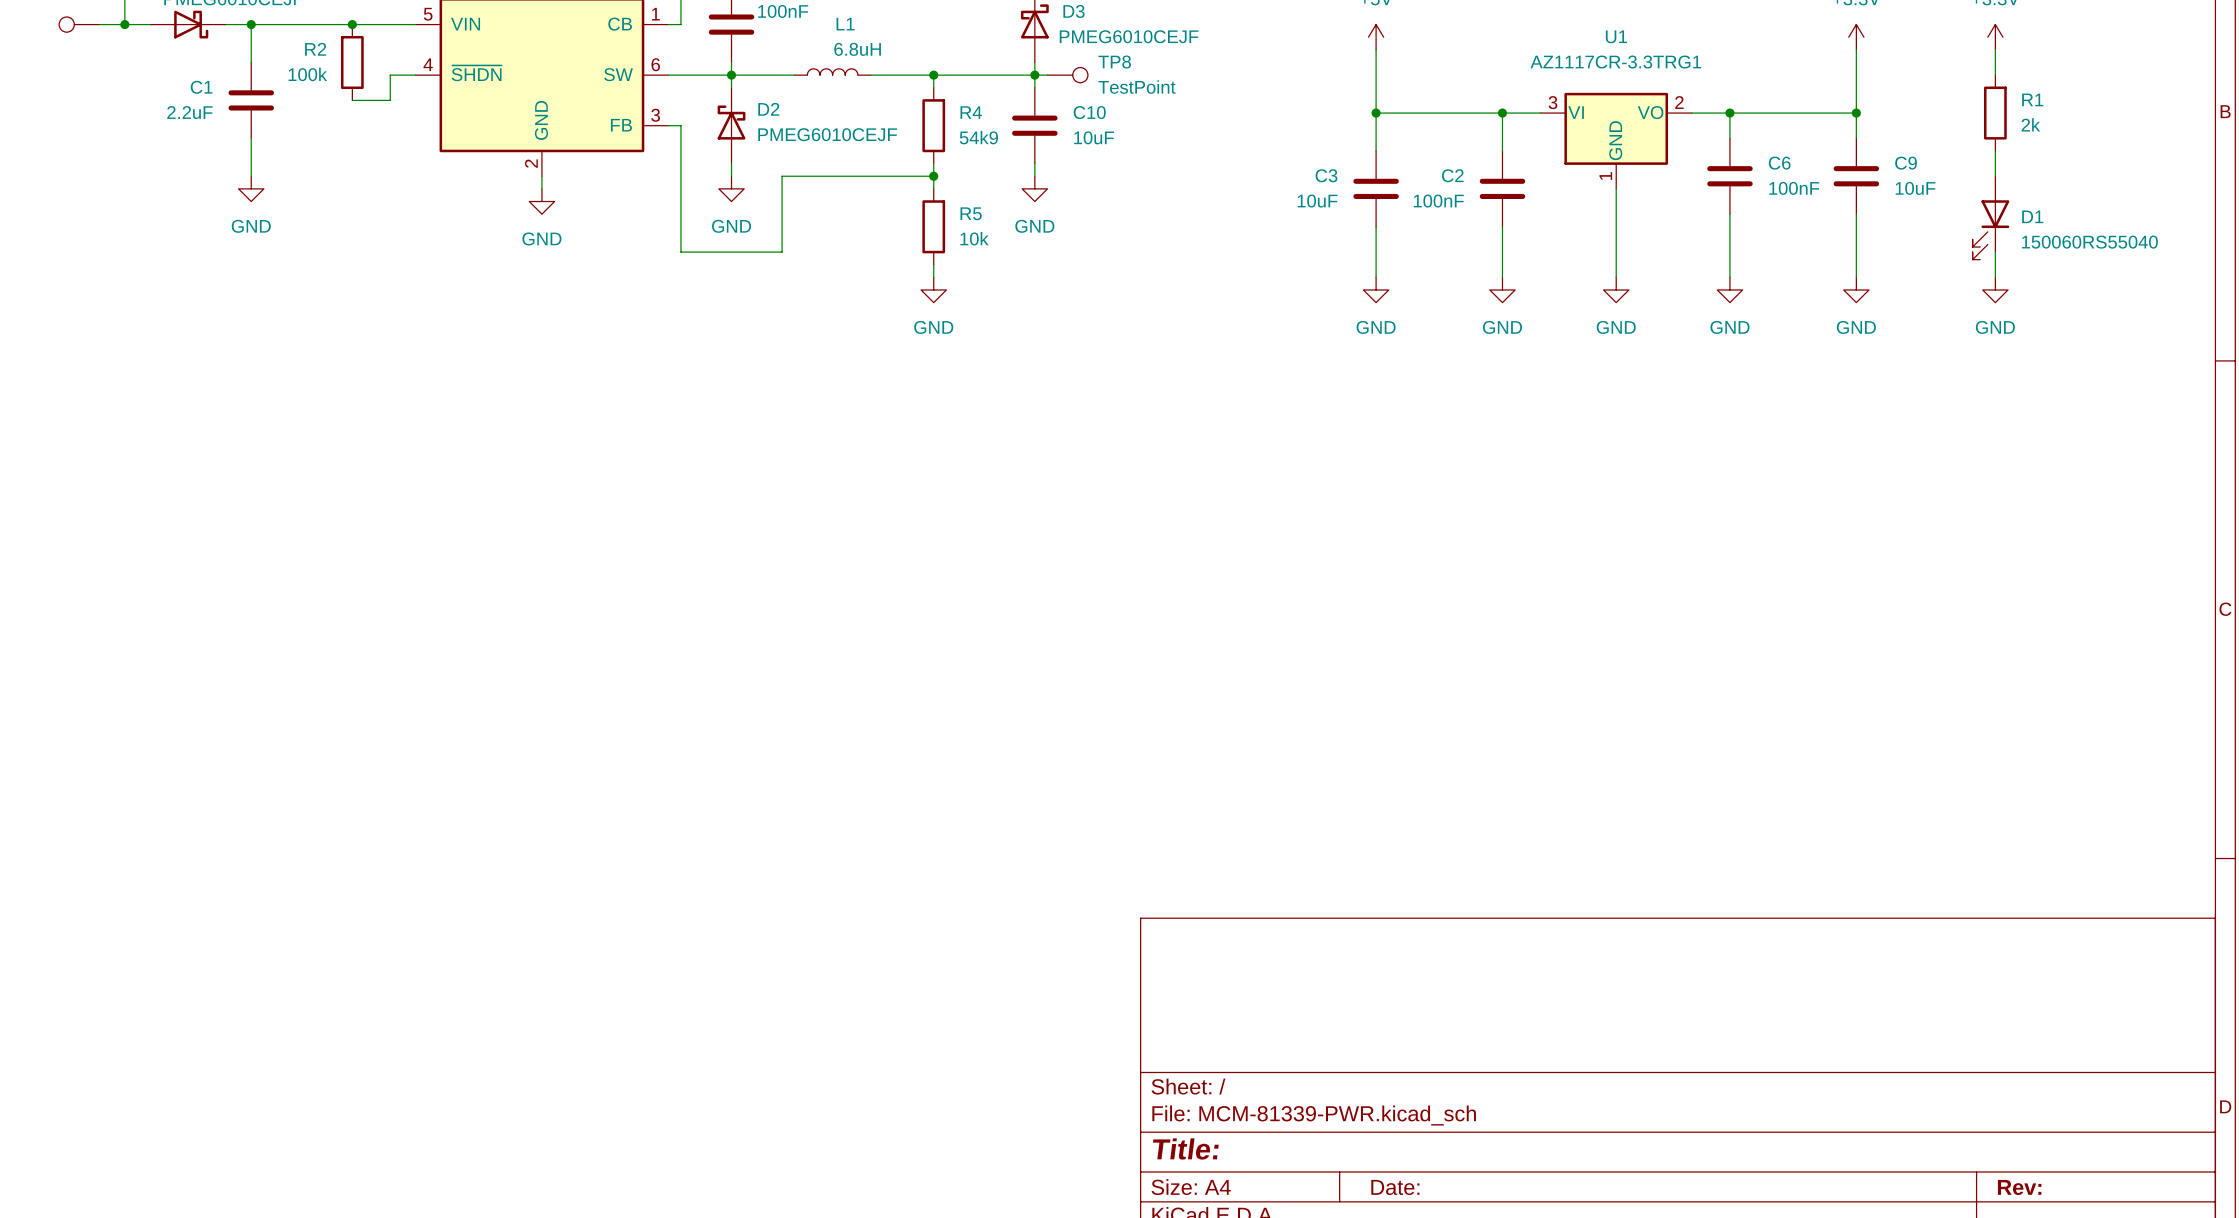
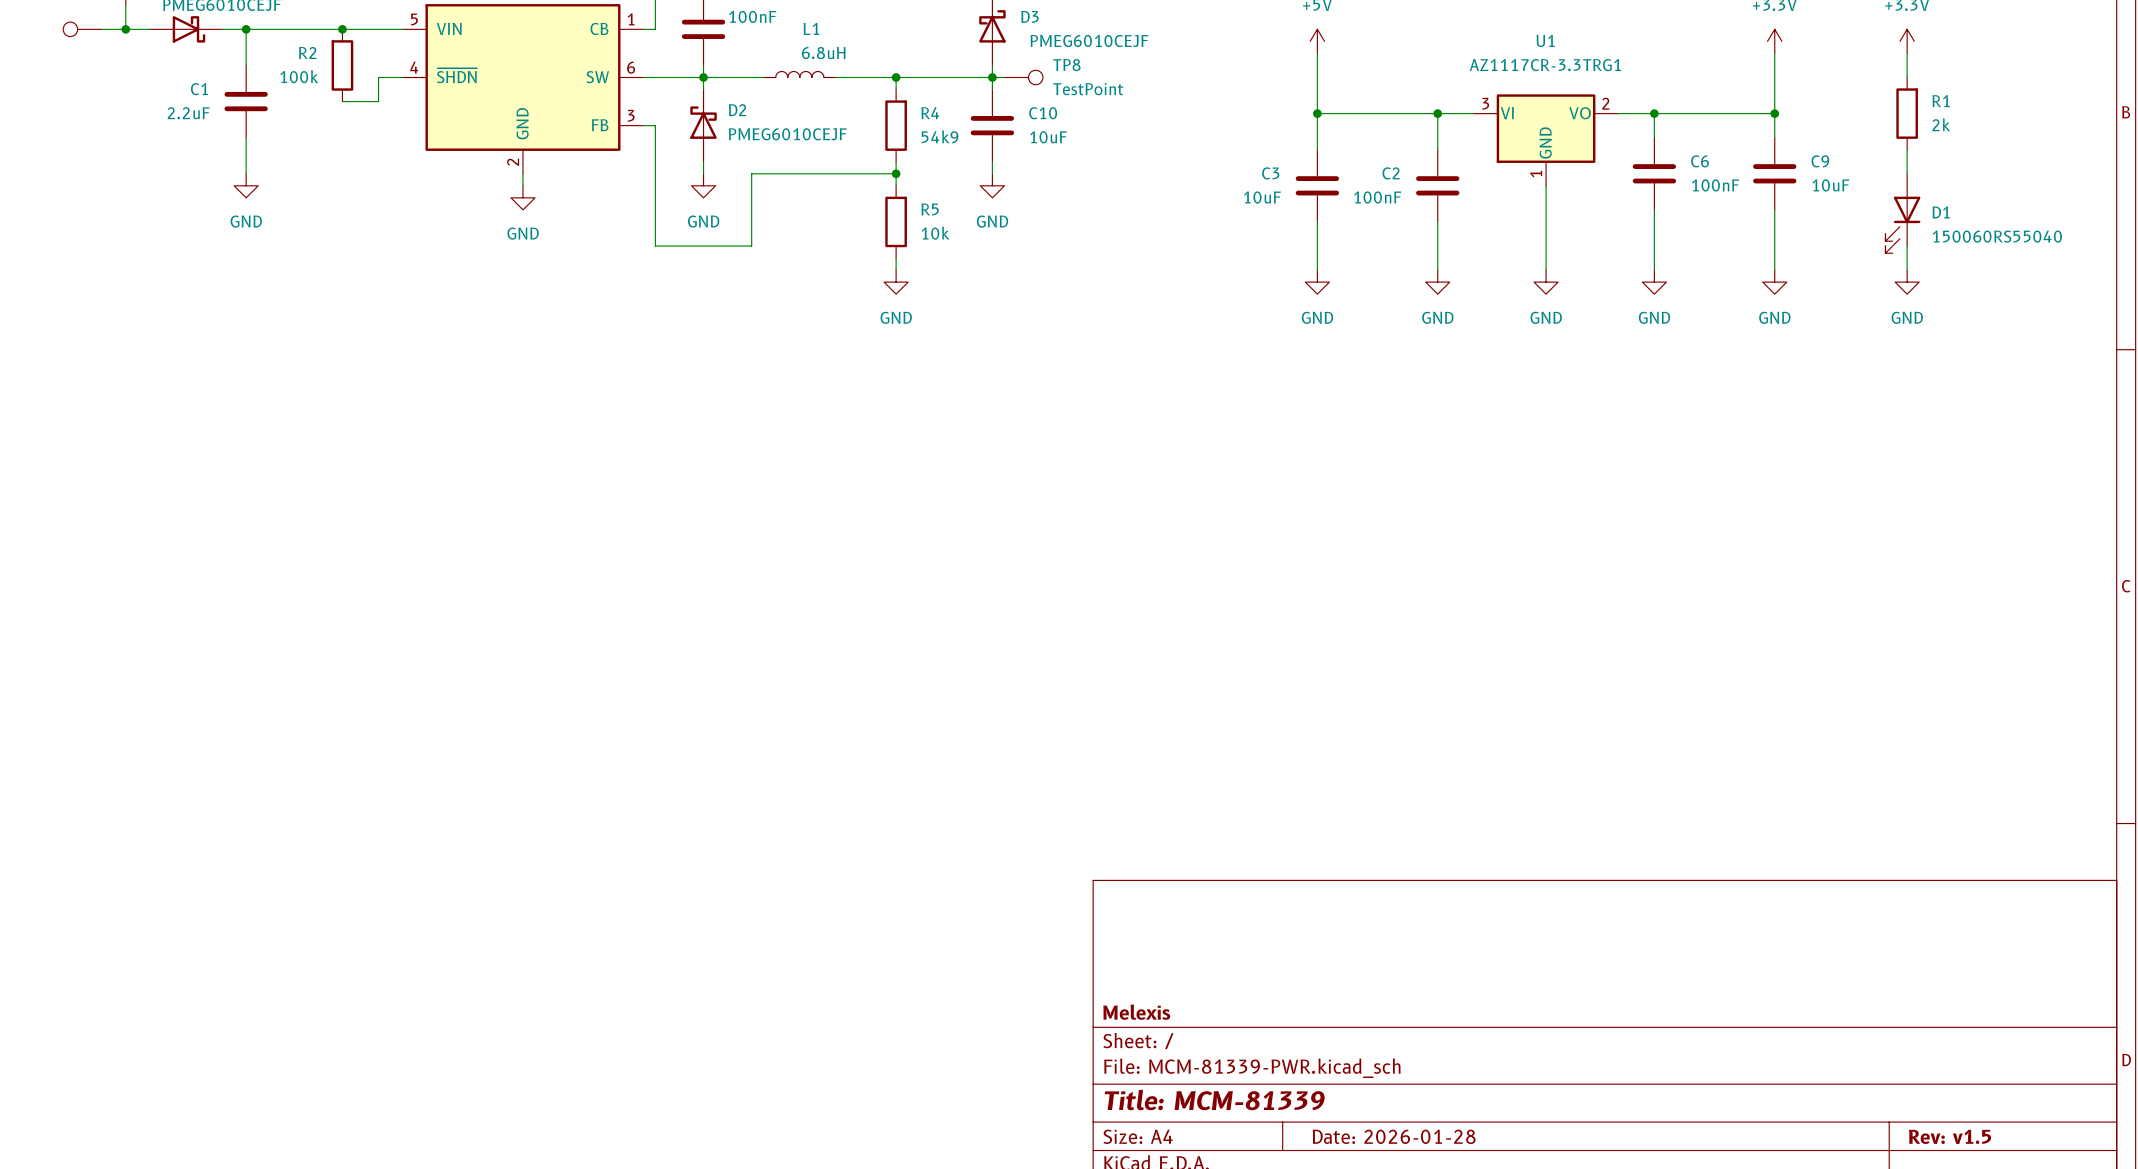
title block: none -> Melexis (1136, 1012)
title block: Title: (1185, 1148) -> Title: MCM-81339 (1214, 1099)
title block: Date: (1395, 1187) -> Date: 2026-01-28 (1394, 1136)
title block: Rev: (2019, 1187) -> Rev: v1.5 (1950, 1136)

